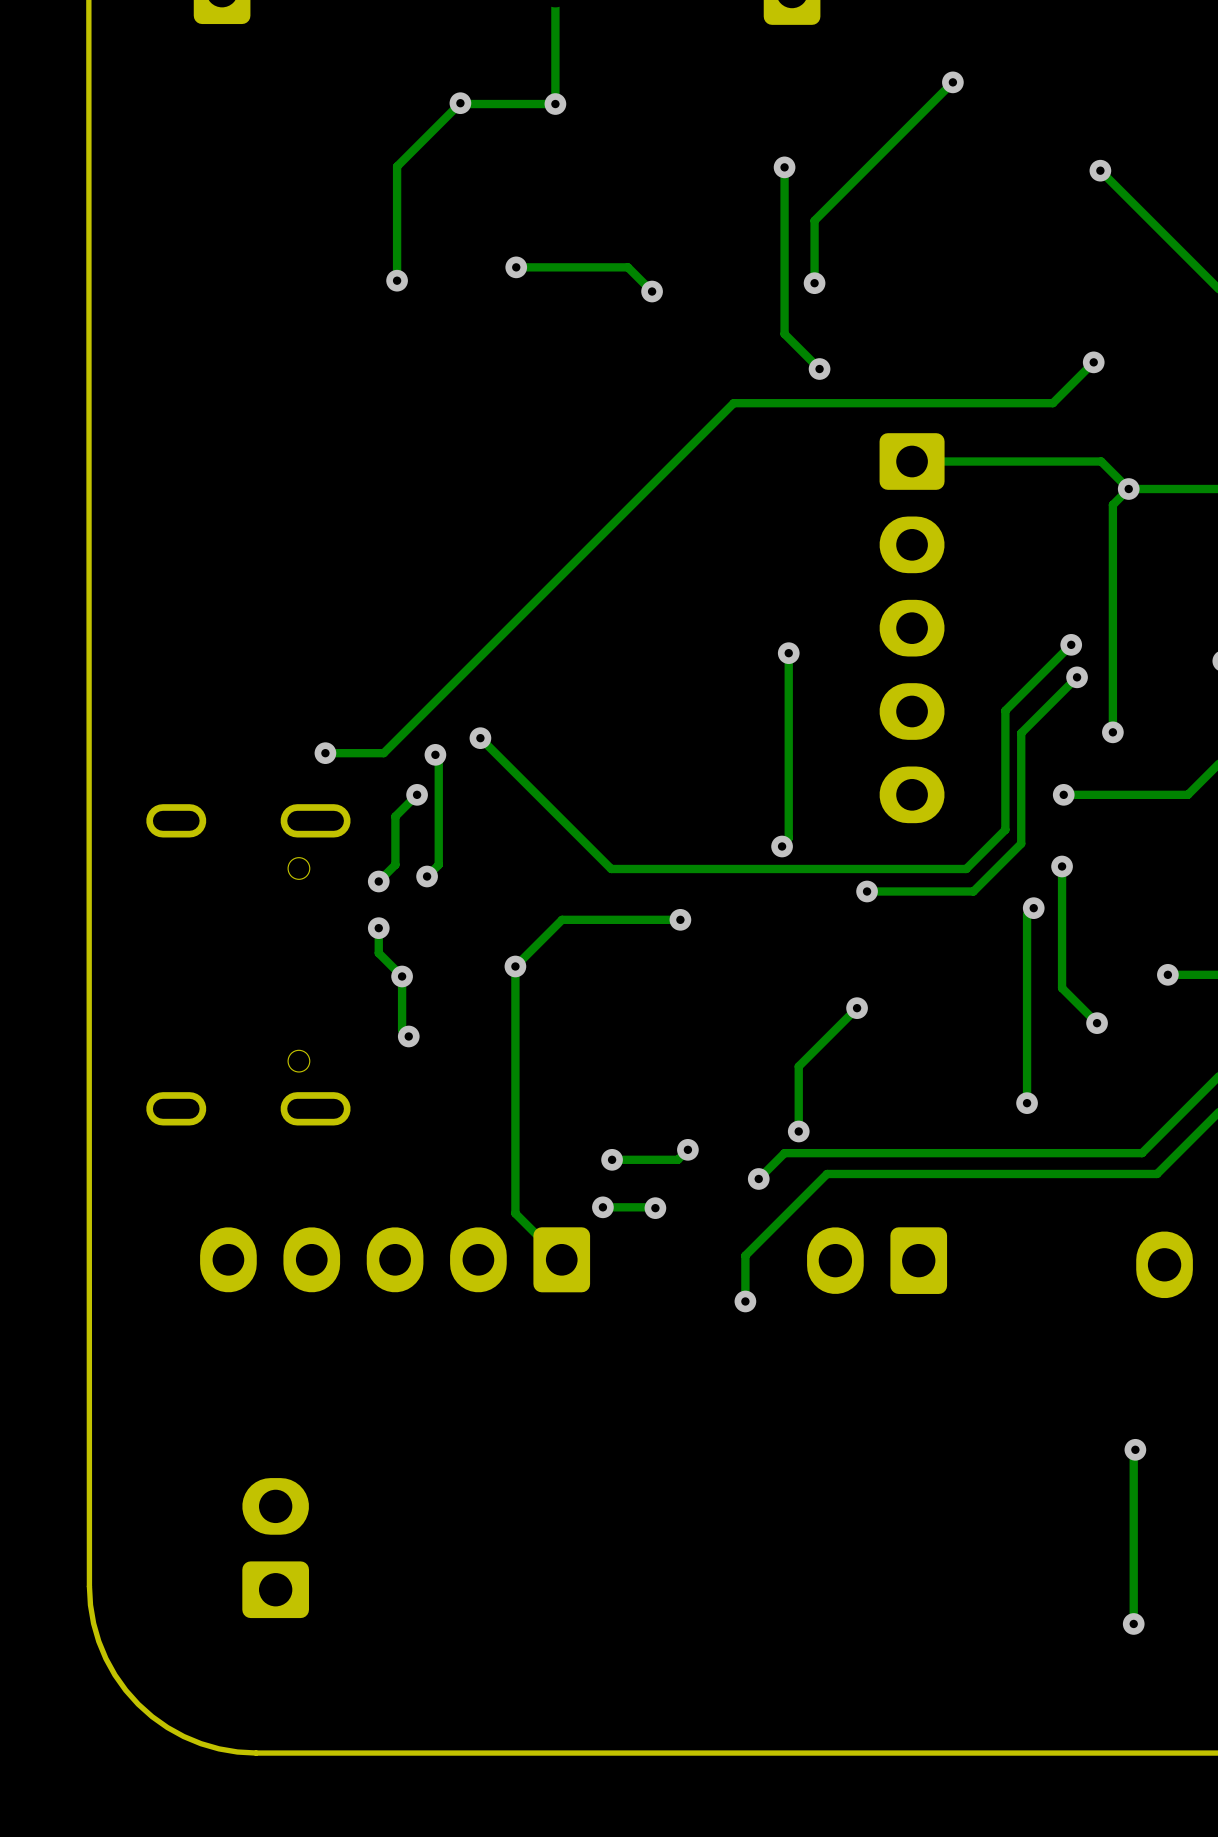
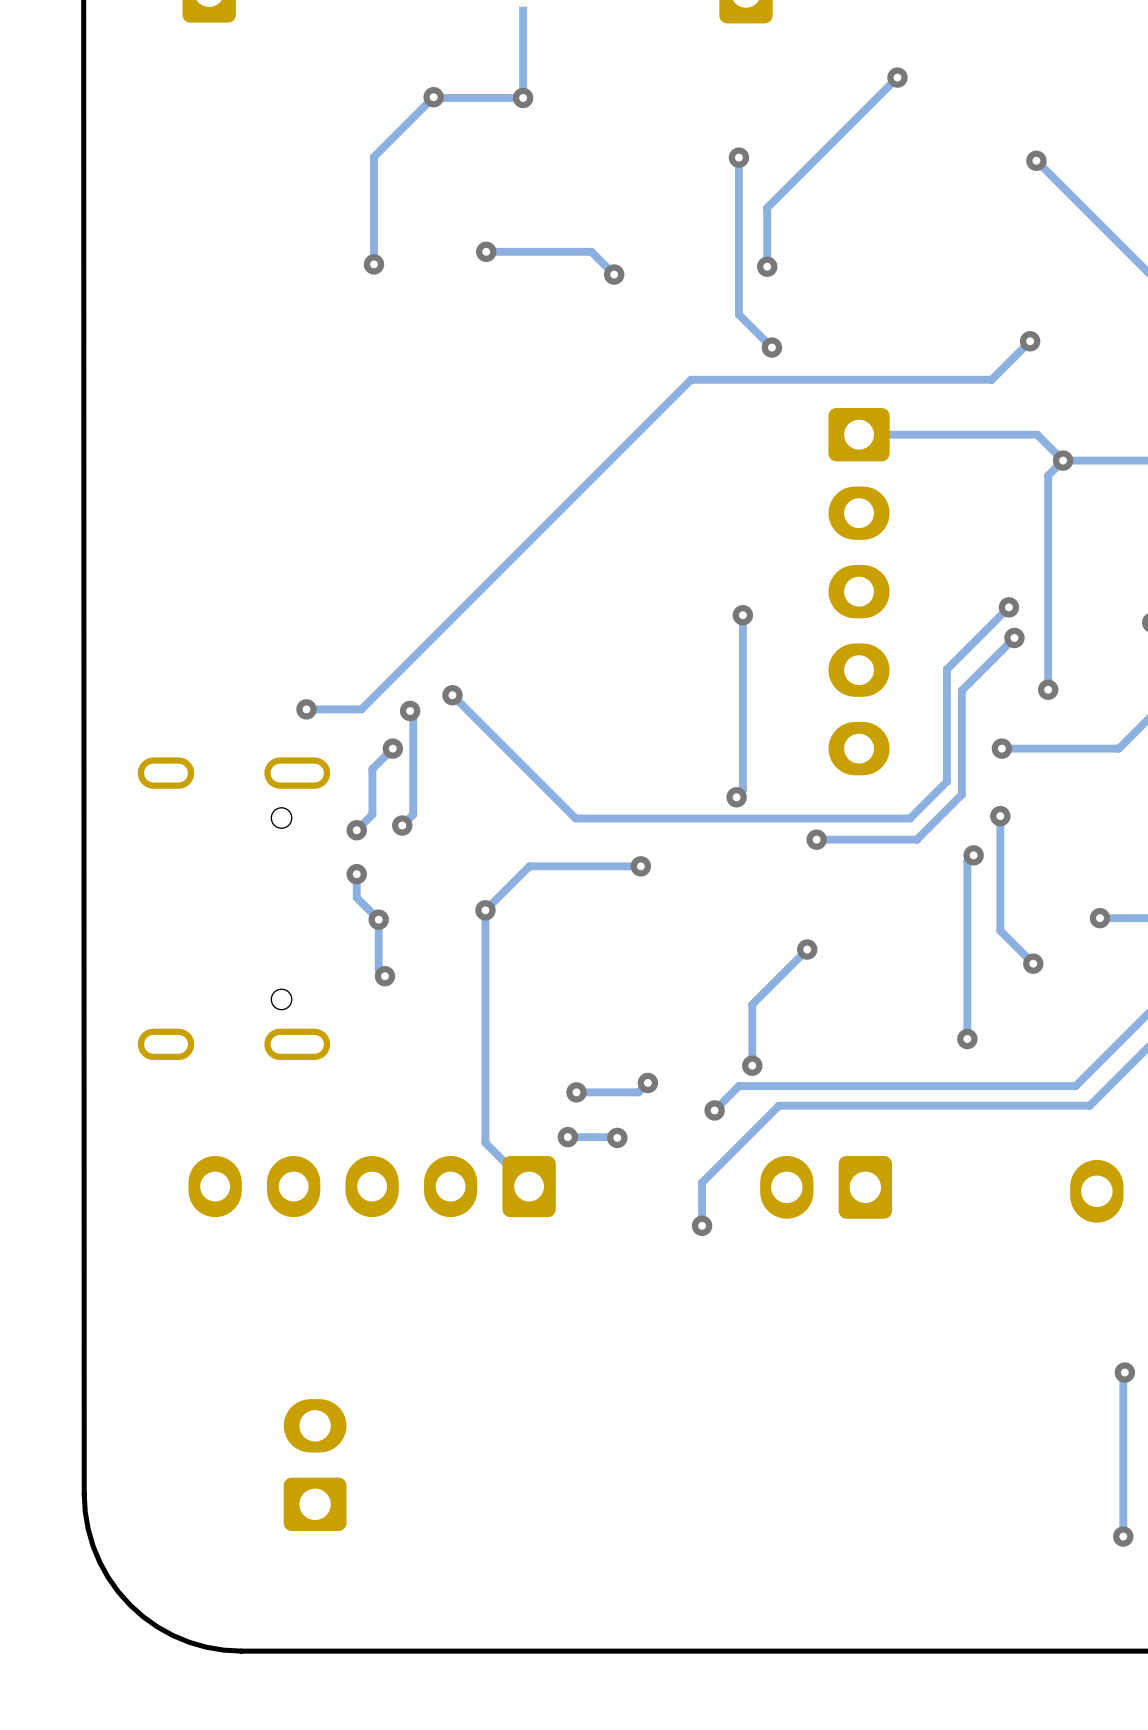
track: (1135, 1449) (1133, 1451) (1132, 1623) -> (1124, 1372) (1123, 1374) (1122, 1535)
via position: (1135, 1449) -> (1124, 1372)
part position: (275, 1548) -> (315, 1465)
via position: (1133, 1623) -> (1123, 1536)

